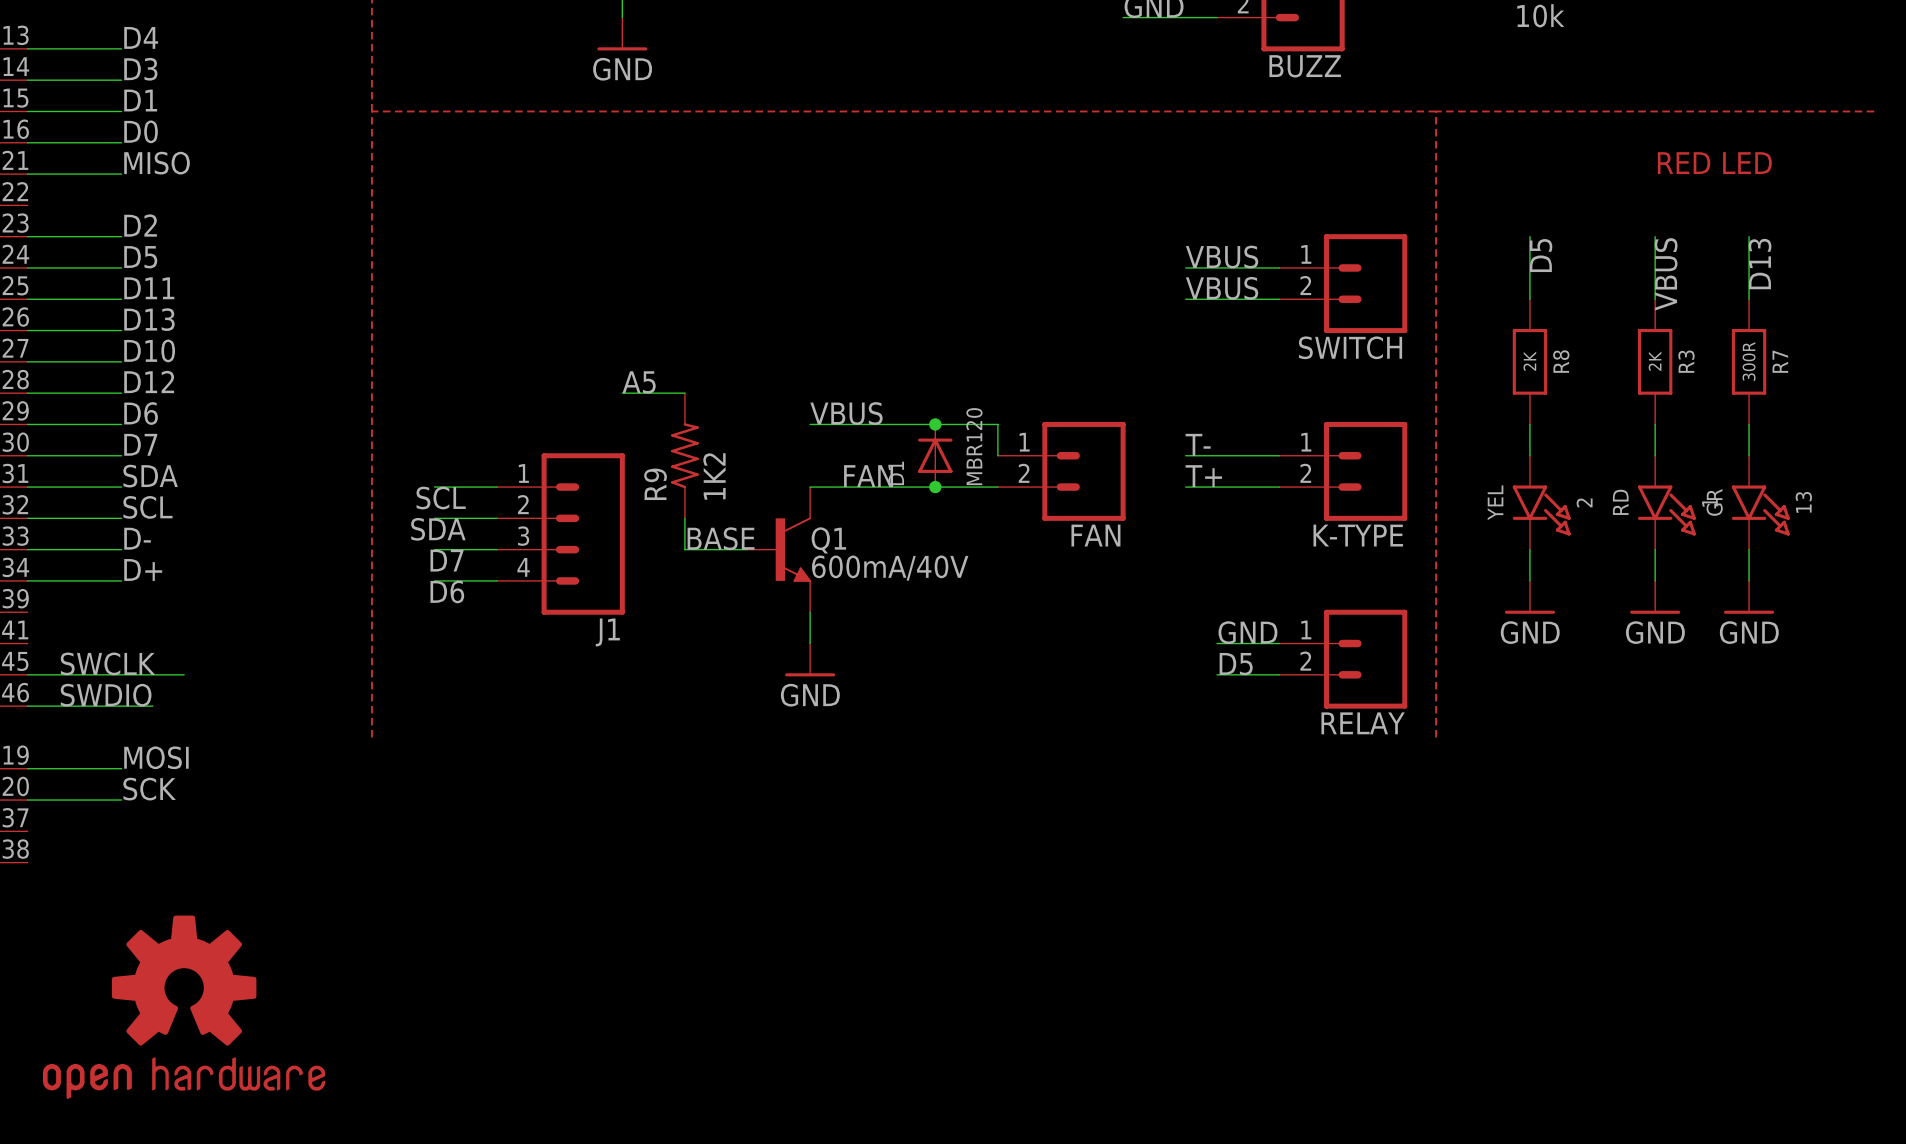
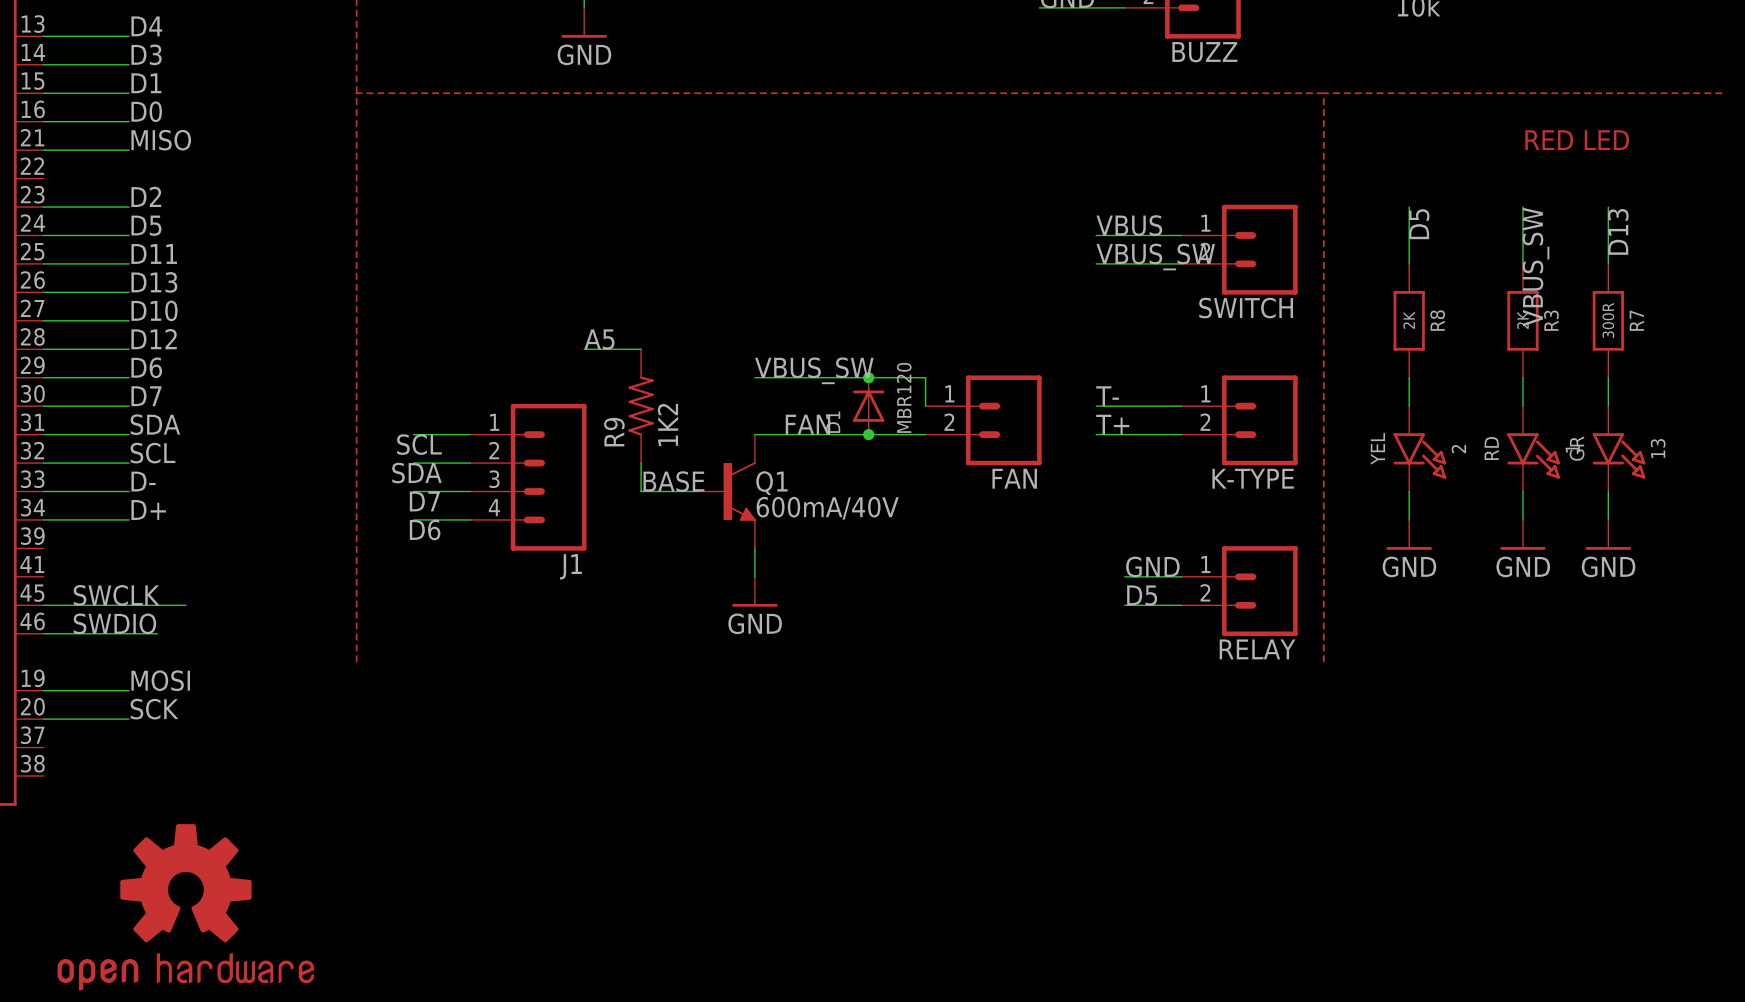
label: VBUS (1666, 274) -> VBUS_SW (1535, 267)
label: VBUS (1222, 288) -> VBUS_SW (1155, 257)
label: VBUS (846, 413) -> VBUS_SW (814, 370)

